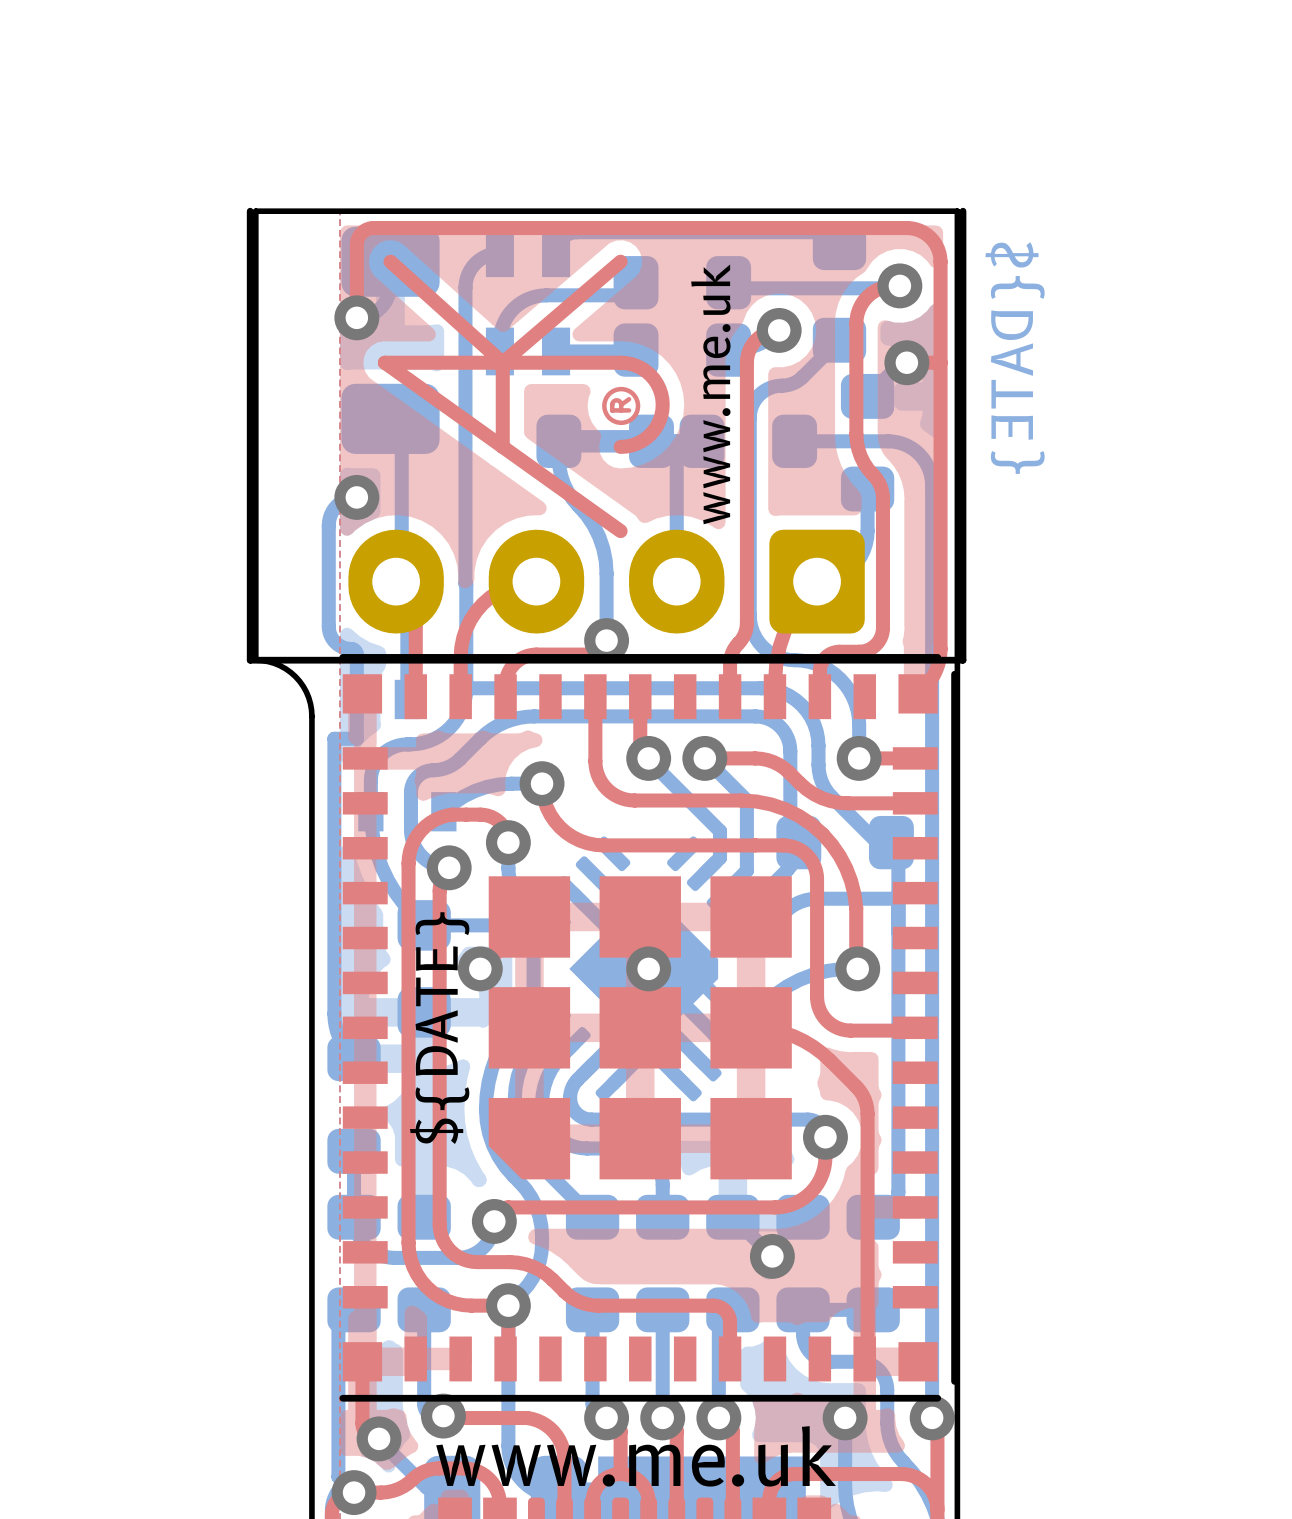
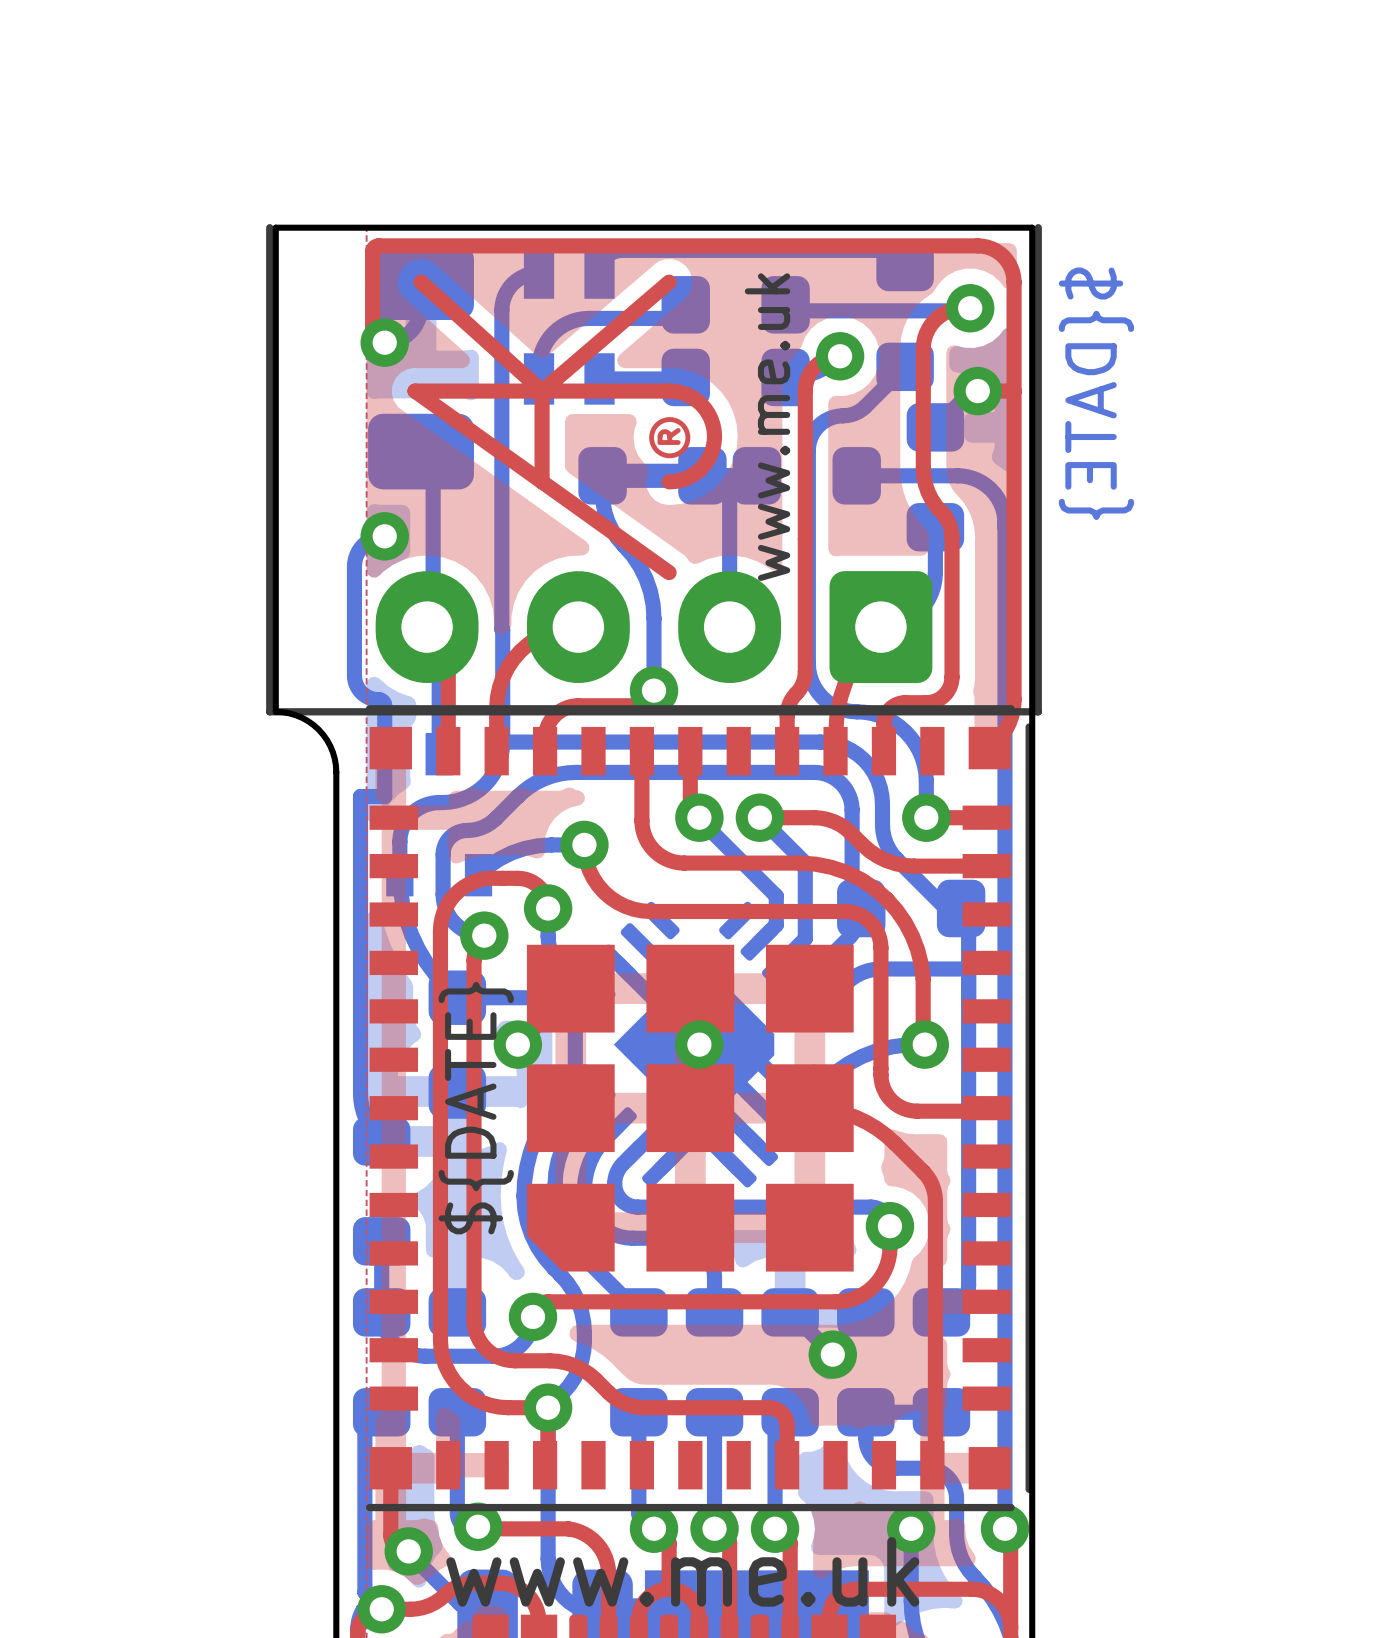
top track: (373, 228) (361, 232) (356, 242) (356, 317) -> (402, 245) (378, 245) (372, 250) (372, 332) (377, 340) (384, 342)

